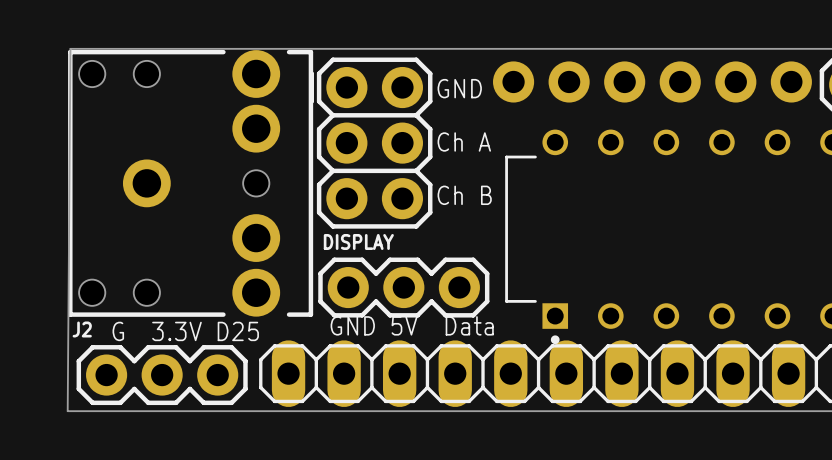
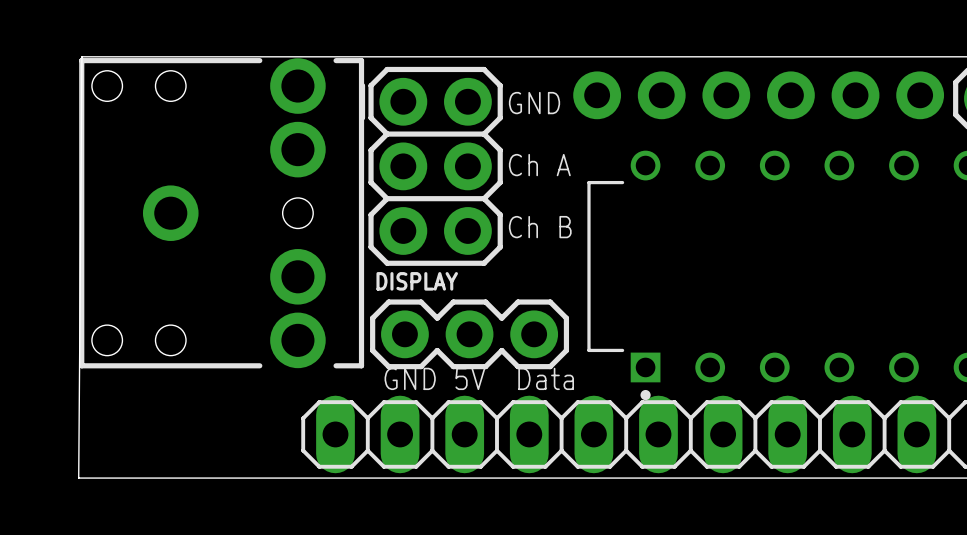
text: G 3.3V D25 (185, 331) -> none
J2: (162, 375) -> none

